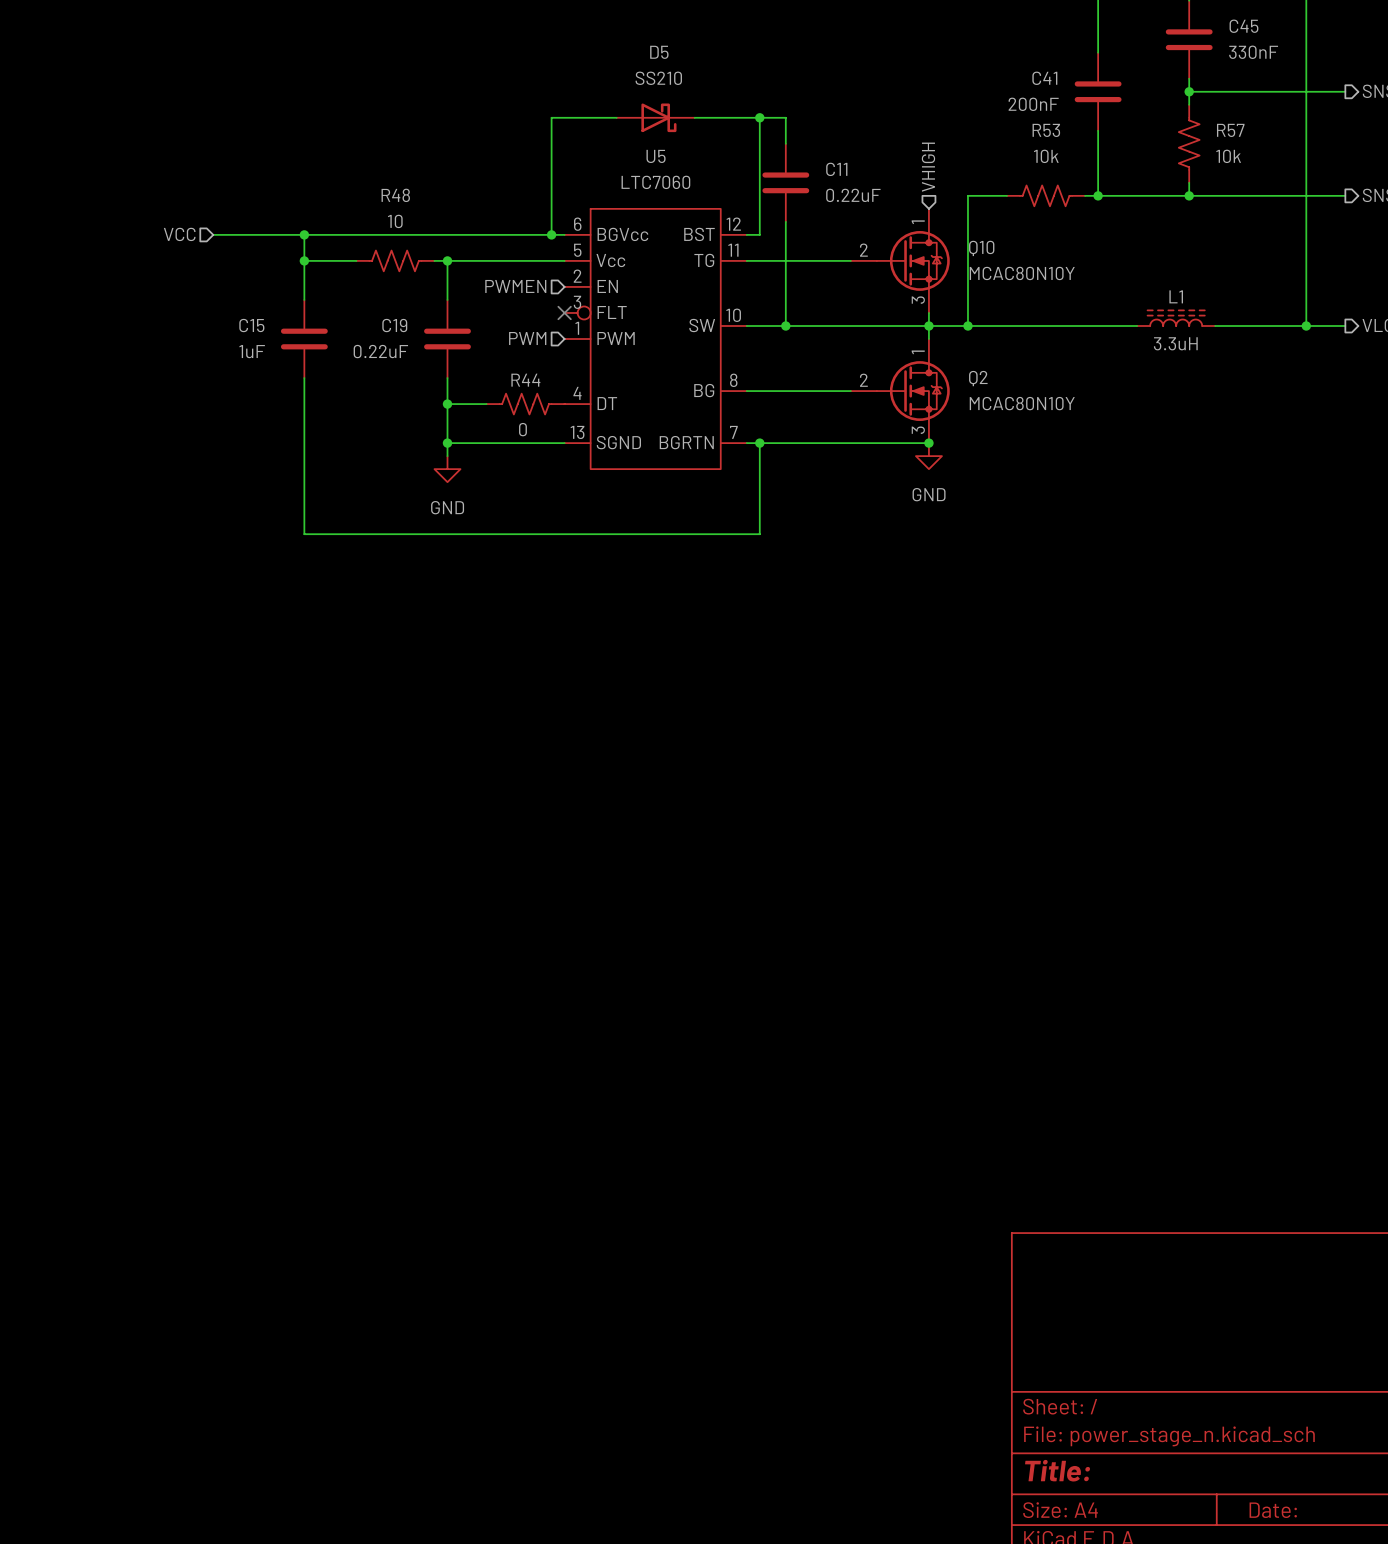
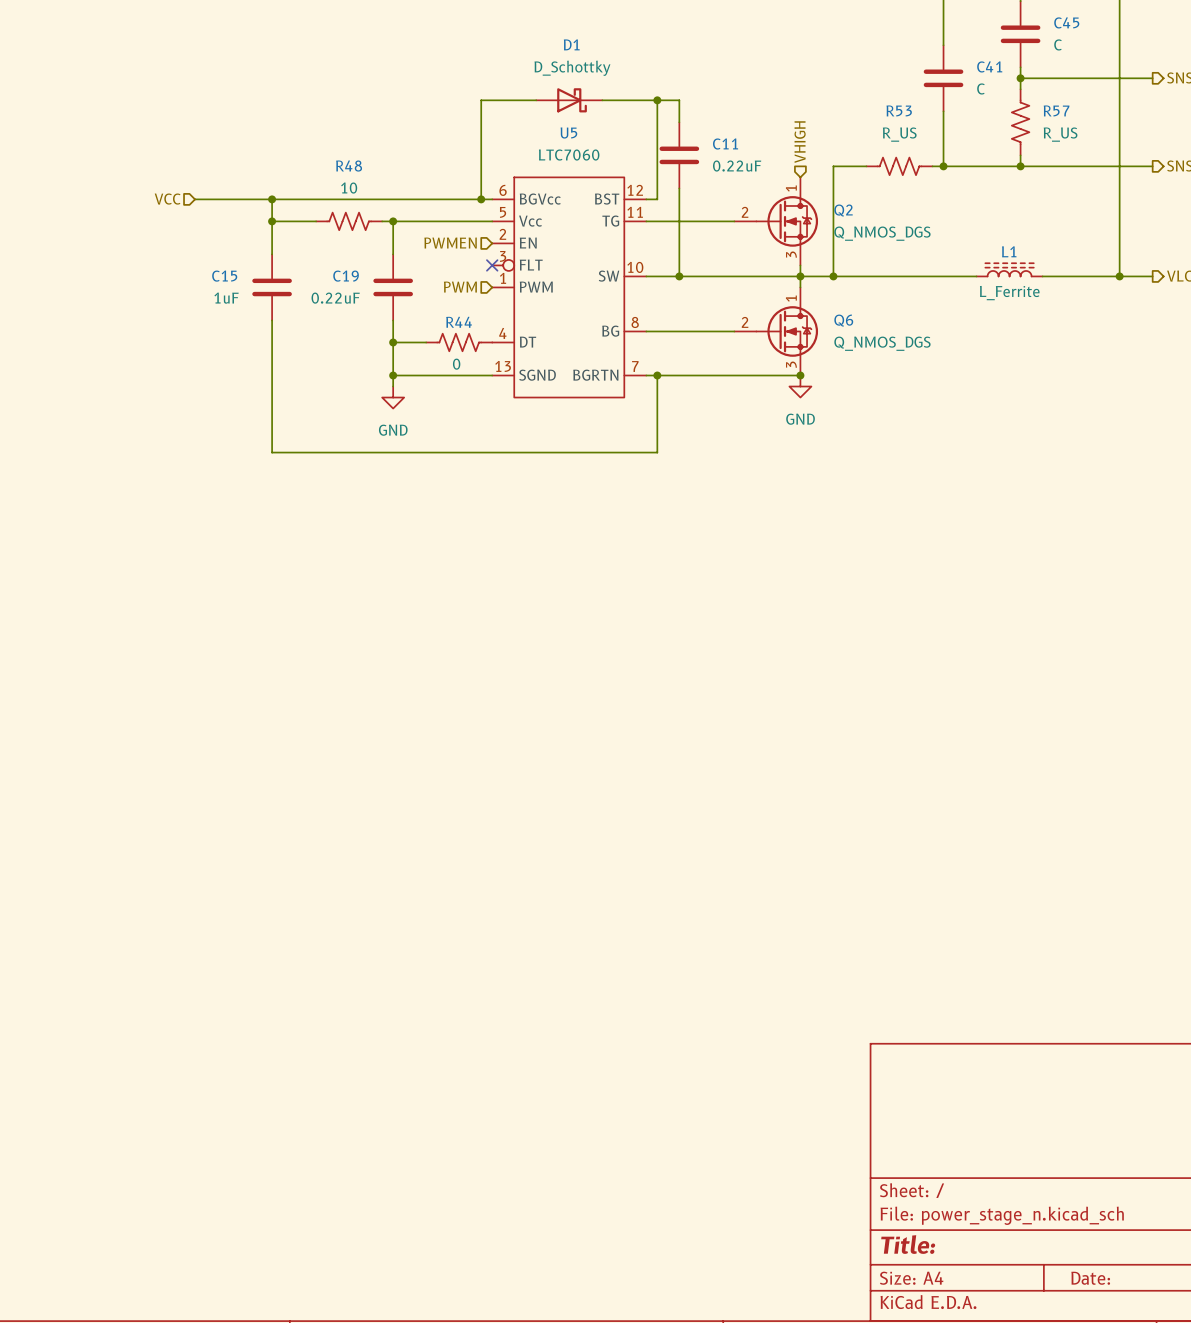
D5 name: D5 (659, 52) -> D1 (571, 44)
C45 value: 330nF (1253, 52) -> C (1057, 44)
D5 value: SS210 (658, 78) -> D_Schottky (572, 68)
C41 name position: C41 (1044, 78) -> C41 (989, 66)
C41 value: 200nF (1033, 104) -> C (980, 88)
R53 value: 10k (1046, 156) -> R_US (899, 134)
R57 value: 10k (1228, 156) -> R_US (1060, 134)
Q10 name: Q10 (981, 248) -> Q2 (843, 210)
Q10 value: MCAC80N10Y (1022, 273) -> Q_NMOS_DGS (882, 233)
L1 value: 3.3uH (1175, 343) -> L_Ferrite (1009, 293)
Q2 name: Q2 (978, 378) -> Q6 (843, 320)
Q2 value: MCAC80N10Y (1022, 403) -> Q_NMOS_DGS (882, 343)

